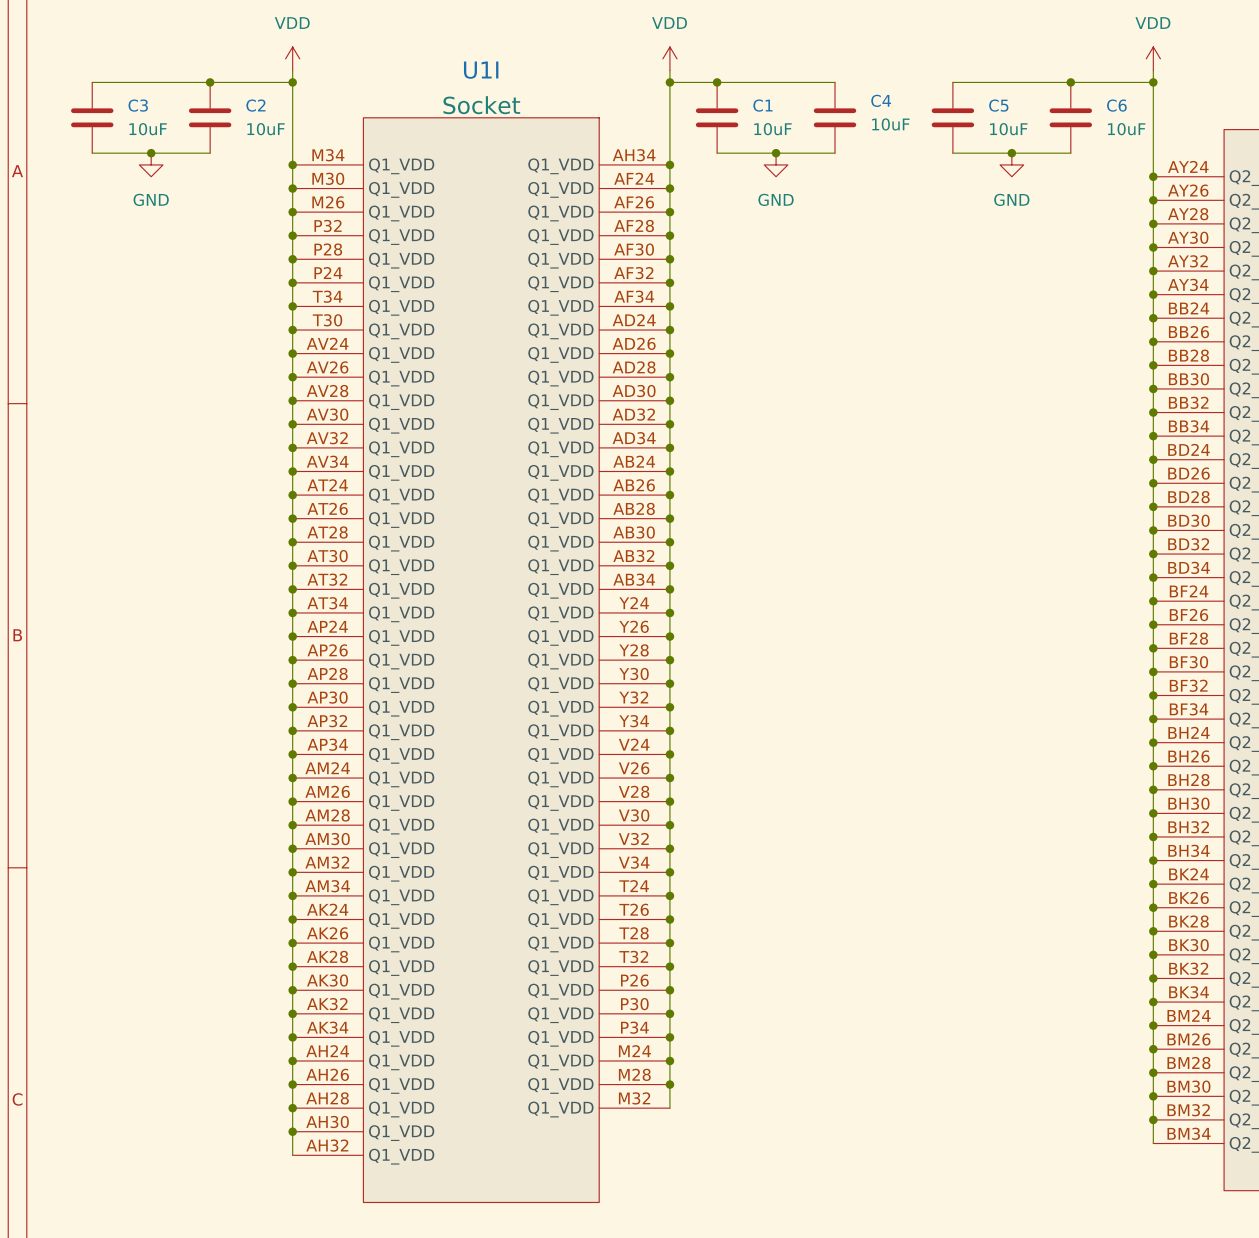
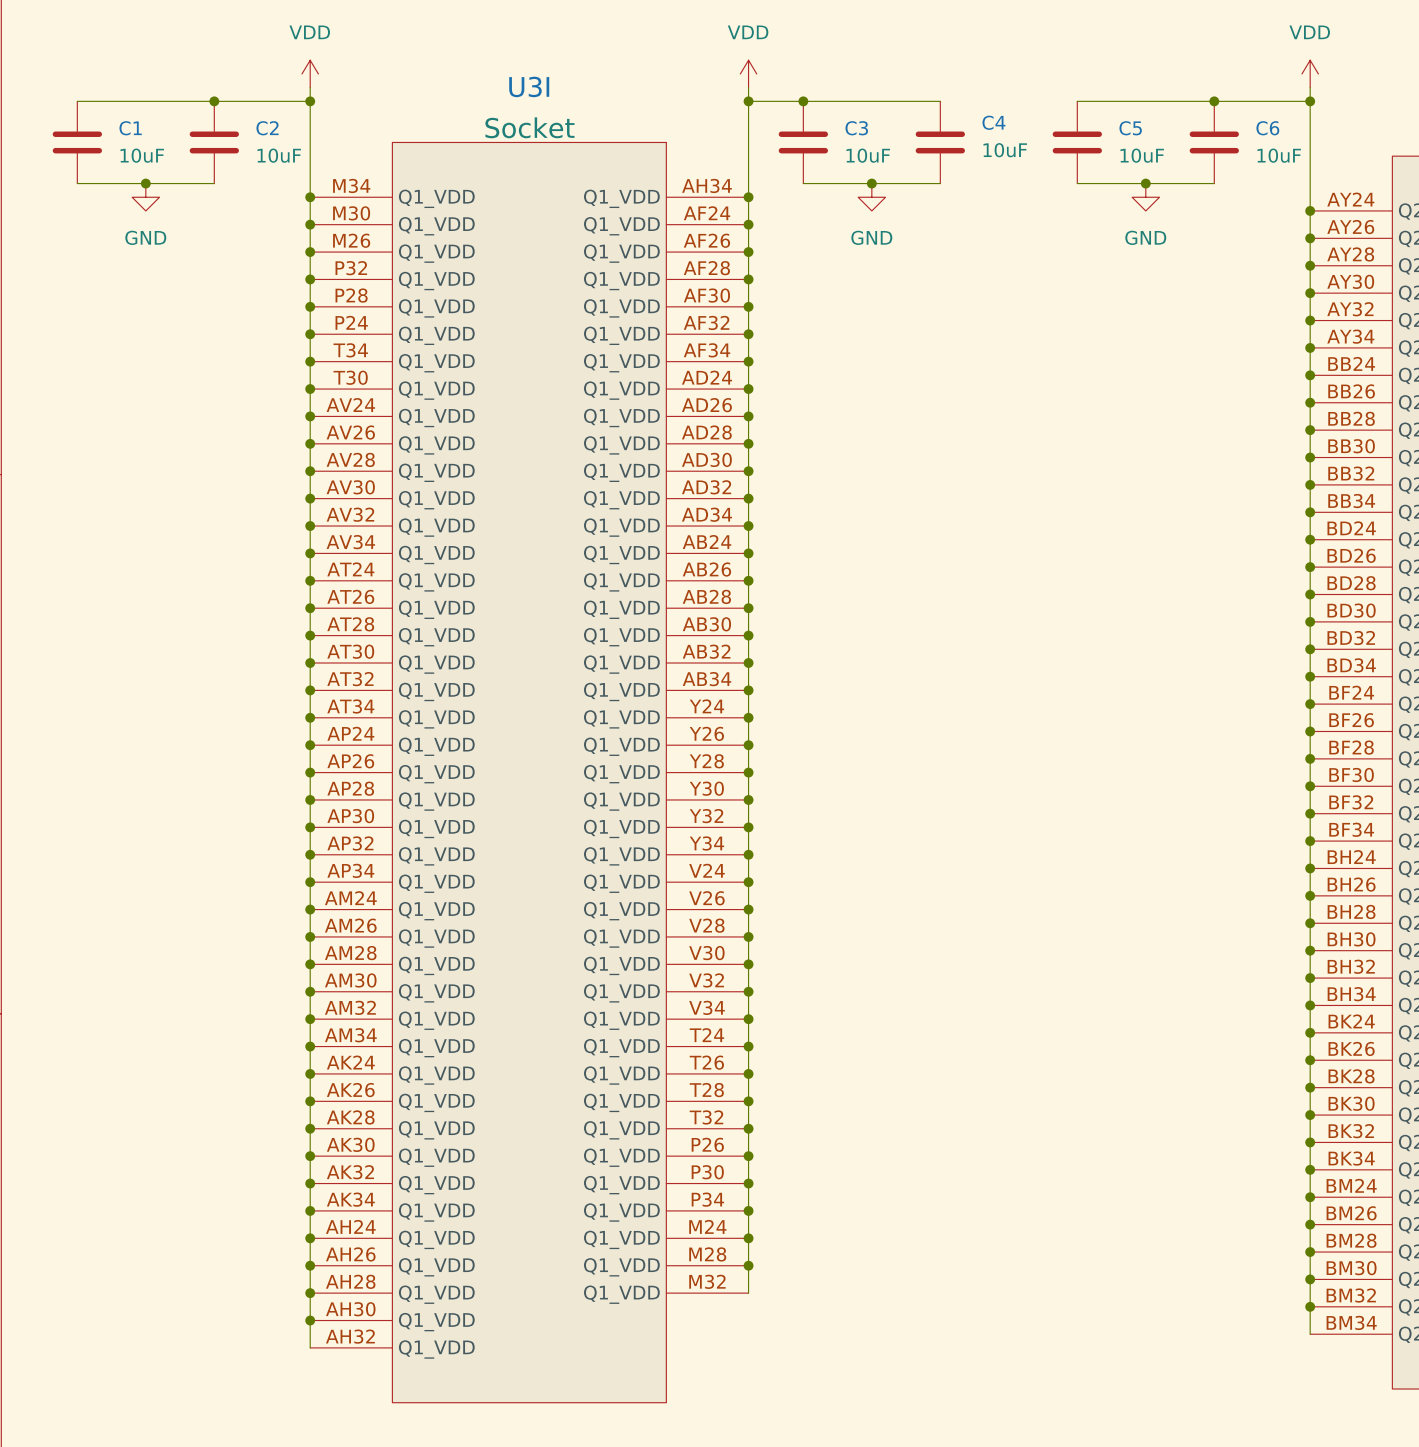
U1I name: U1I (481, 70) -> U3I (529, 86)
C3 name: C3 (138, 105) -> C1 (130, 128)
C1 name: C1 (762, 105) -> C3 (856, 128)

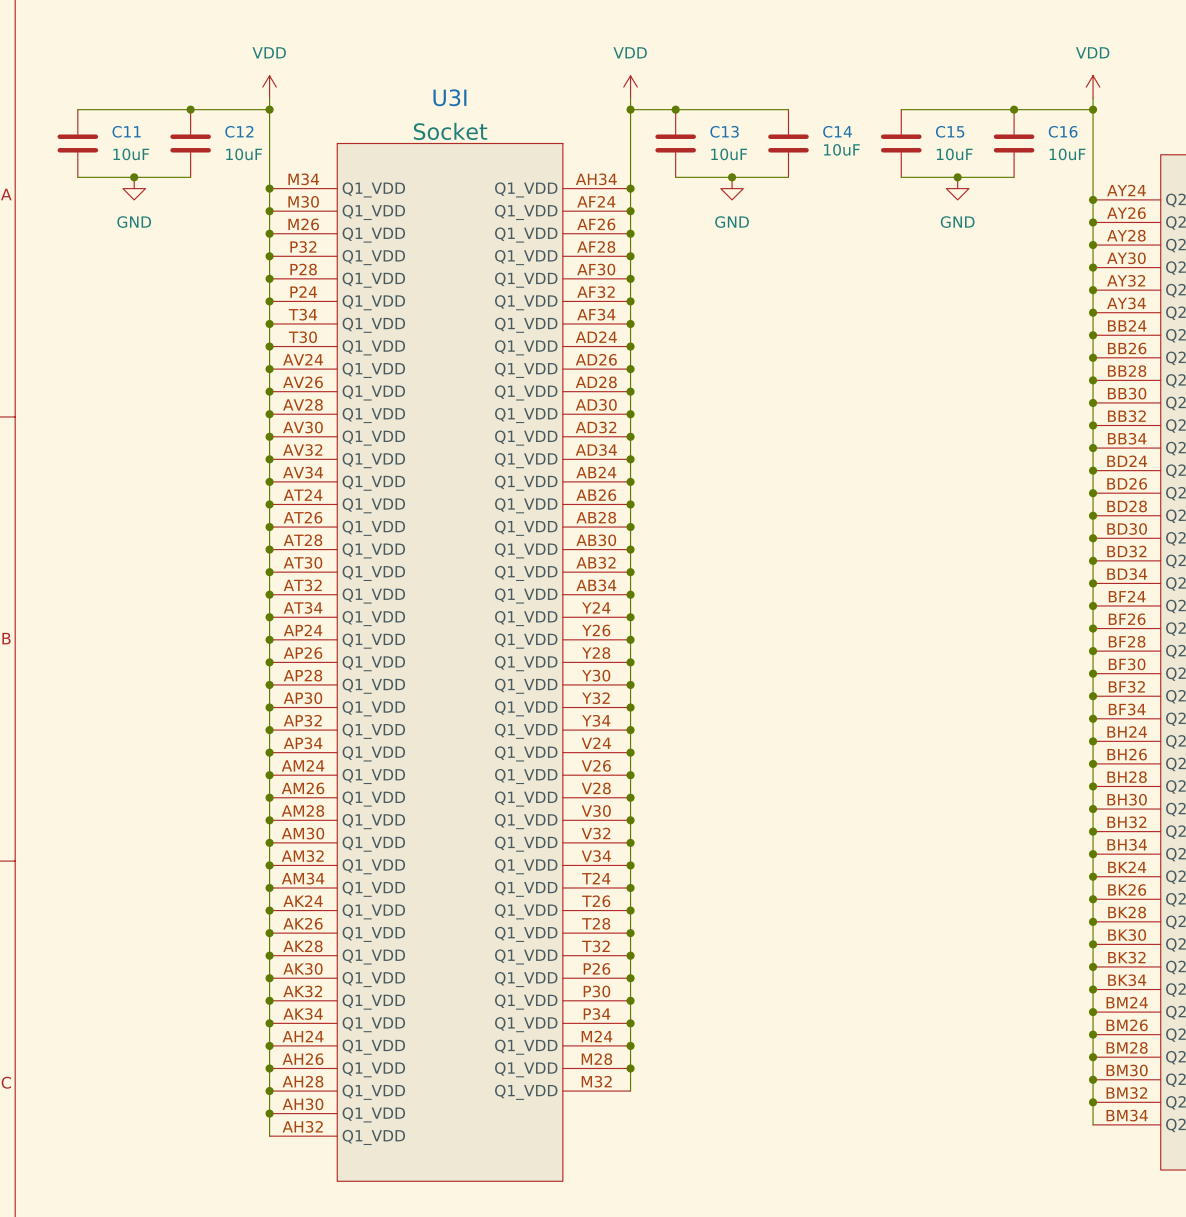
C4 name: C4 (993, 122) -> C14 (837, 131)
C1 name: C1 (130, 128) -> C11 (126, 131)
C2 name: C2 (267, 128) -> C12 (239, 131)
C3 name: C3 (856, 128) -> C13 (724, 131)
C5 name: C5 (1130, 128) -> C15 (950, 131)
C6 name: C6 (1267, 128) -> C16 (1063, 131)

